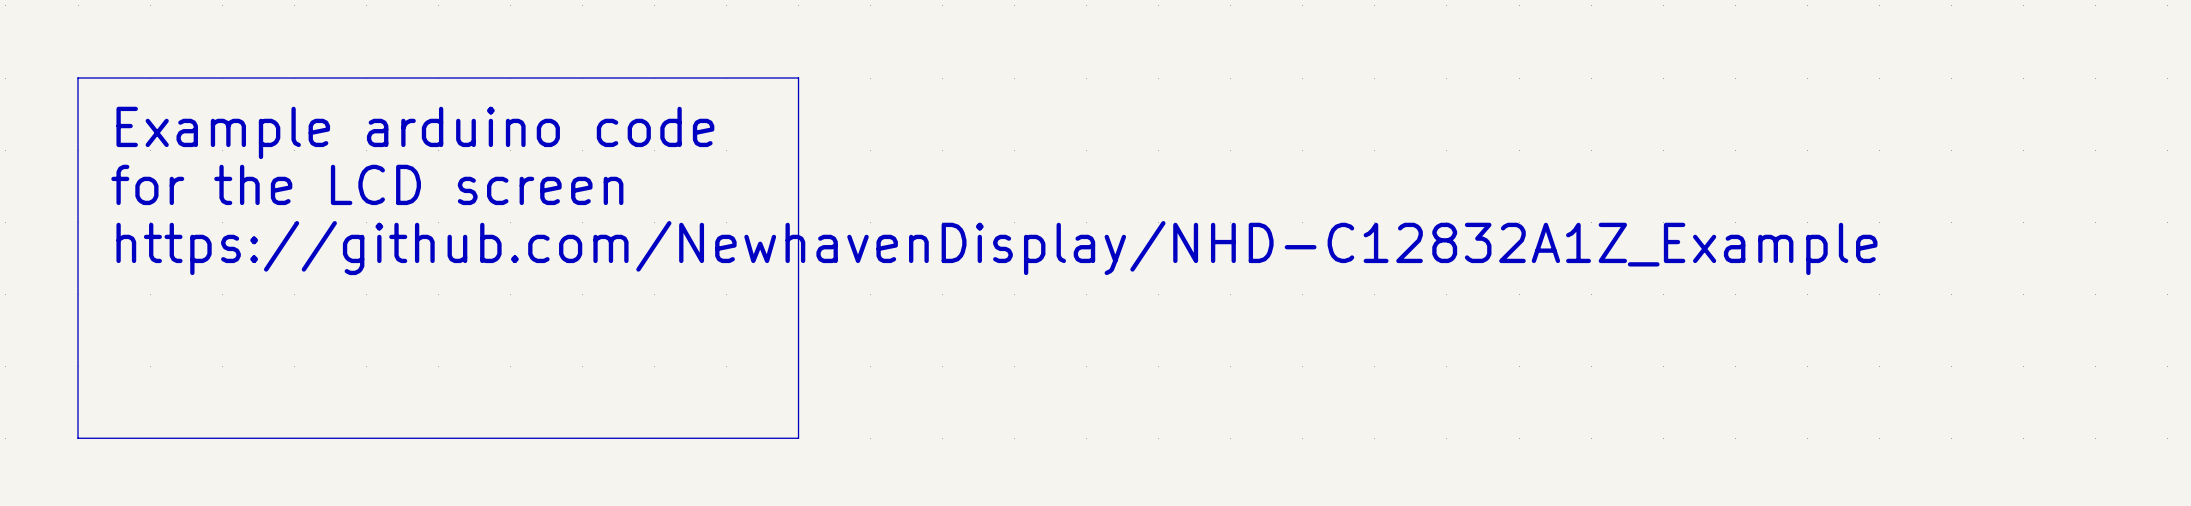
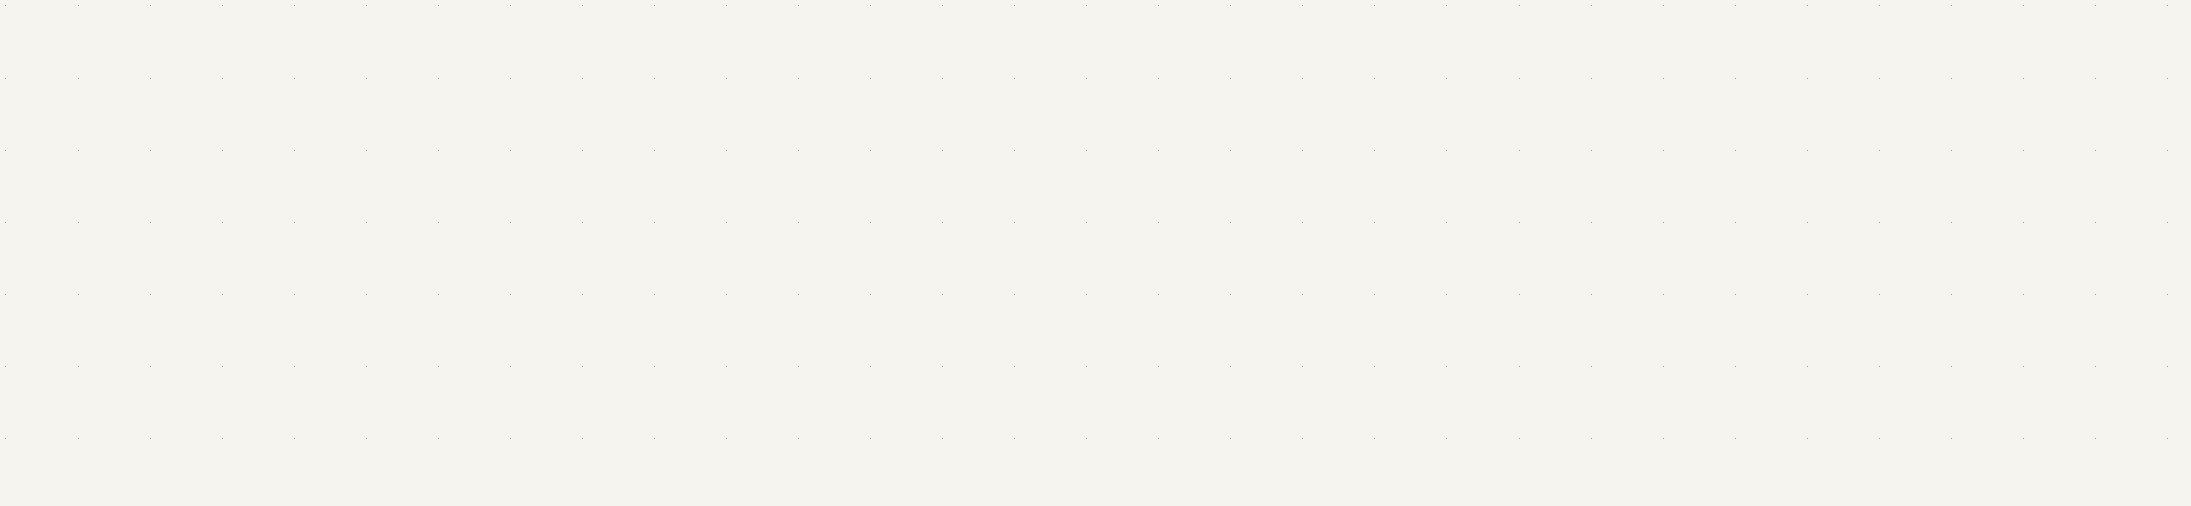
line: (78, 78) (798, 78) (798, 438) (78, 438) (78, 78) -> none
text: Example arduino code (415, 132) -> none
text: for the LCD screen (367, 184) -> none
text: https://github.com/NewhavenDisplay/NHD-C12832A1Z_Example (996, 248) -> none

